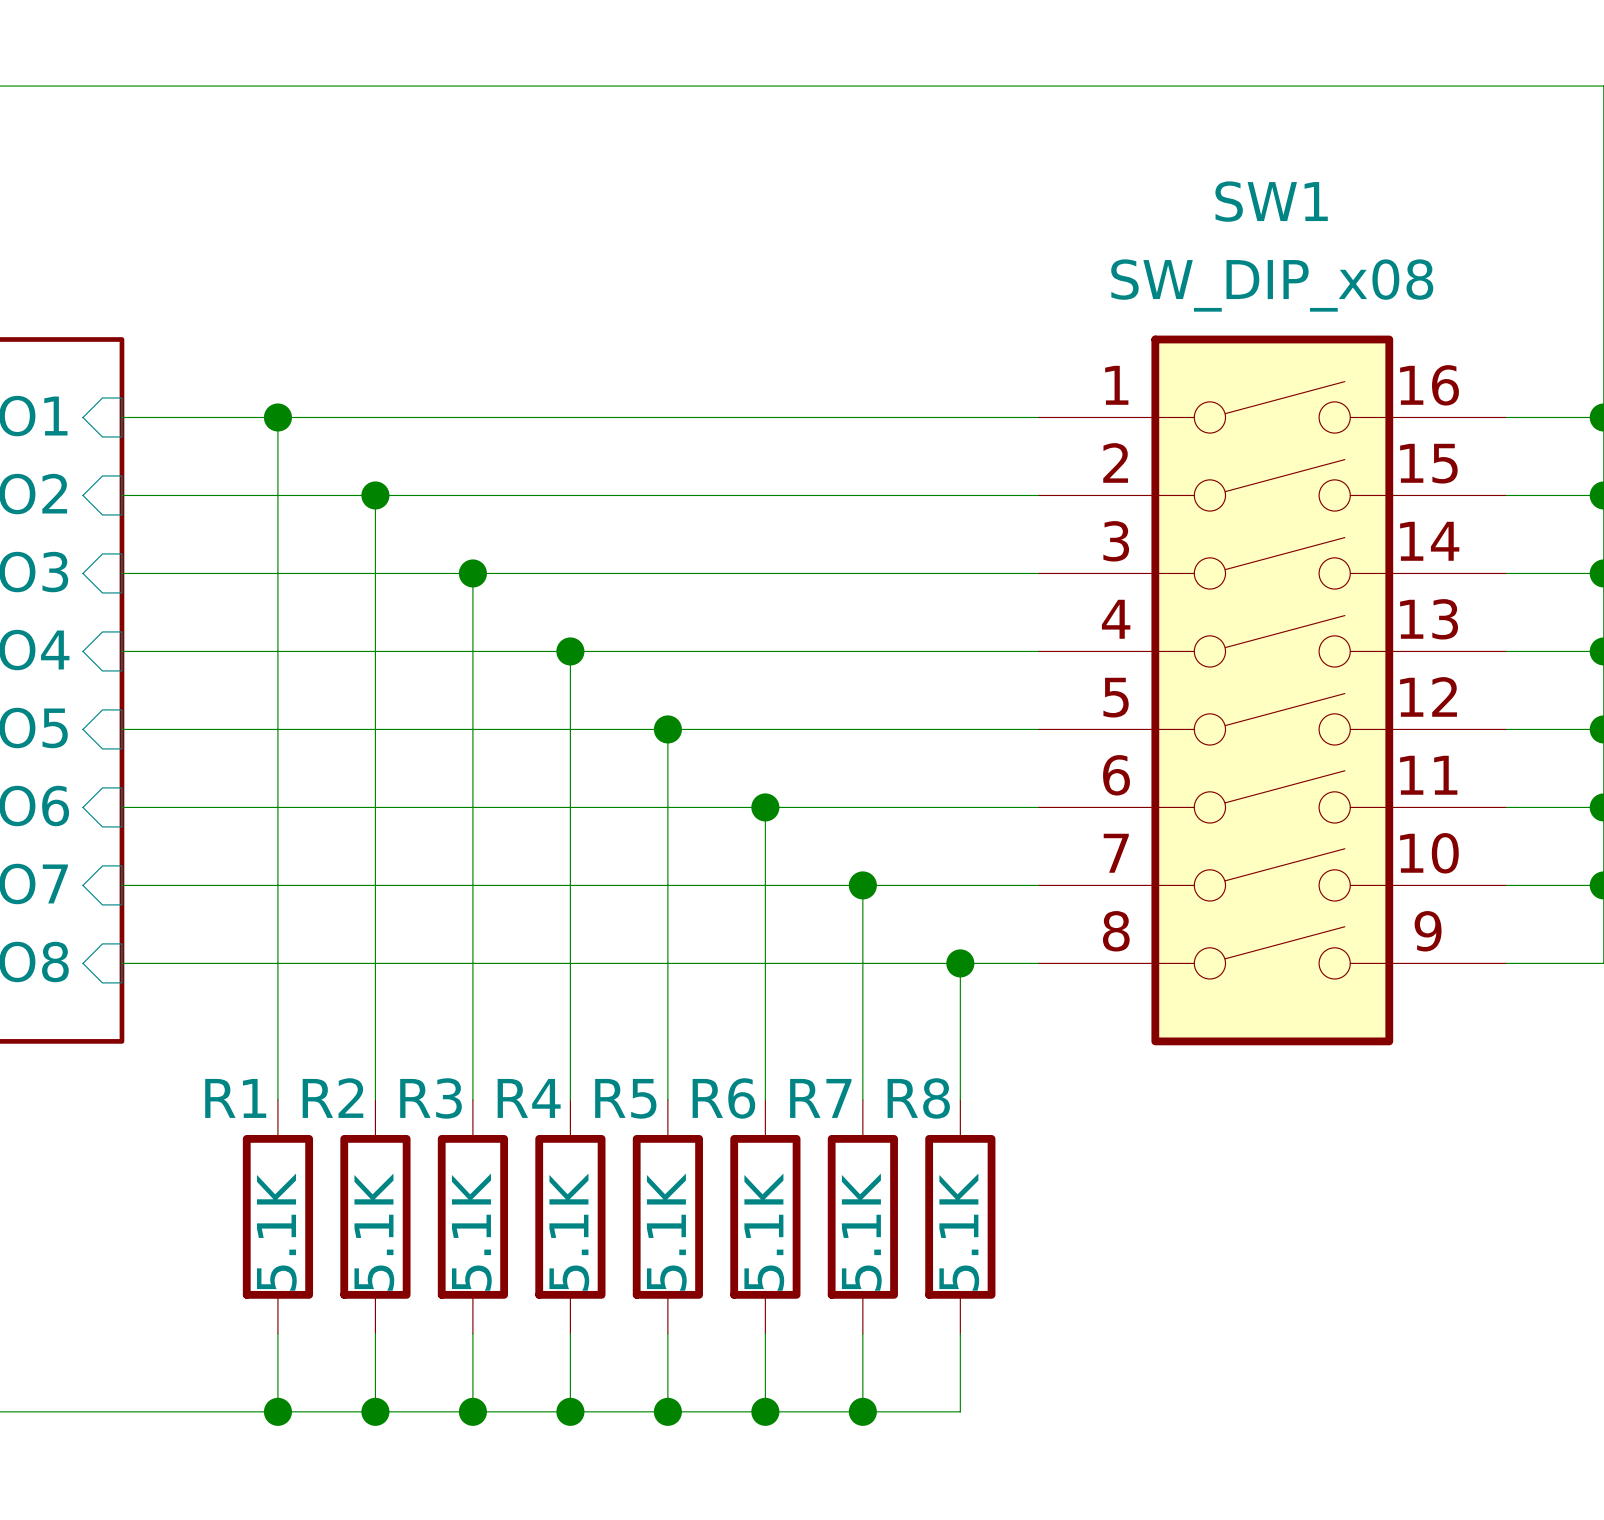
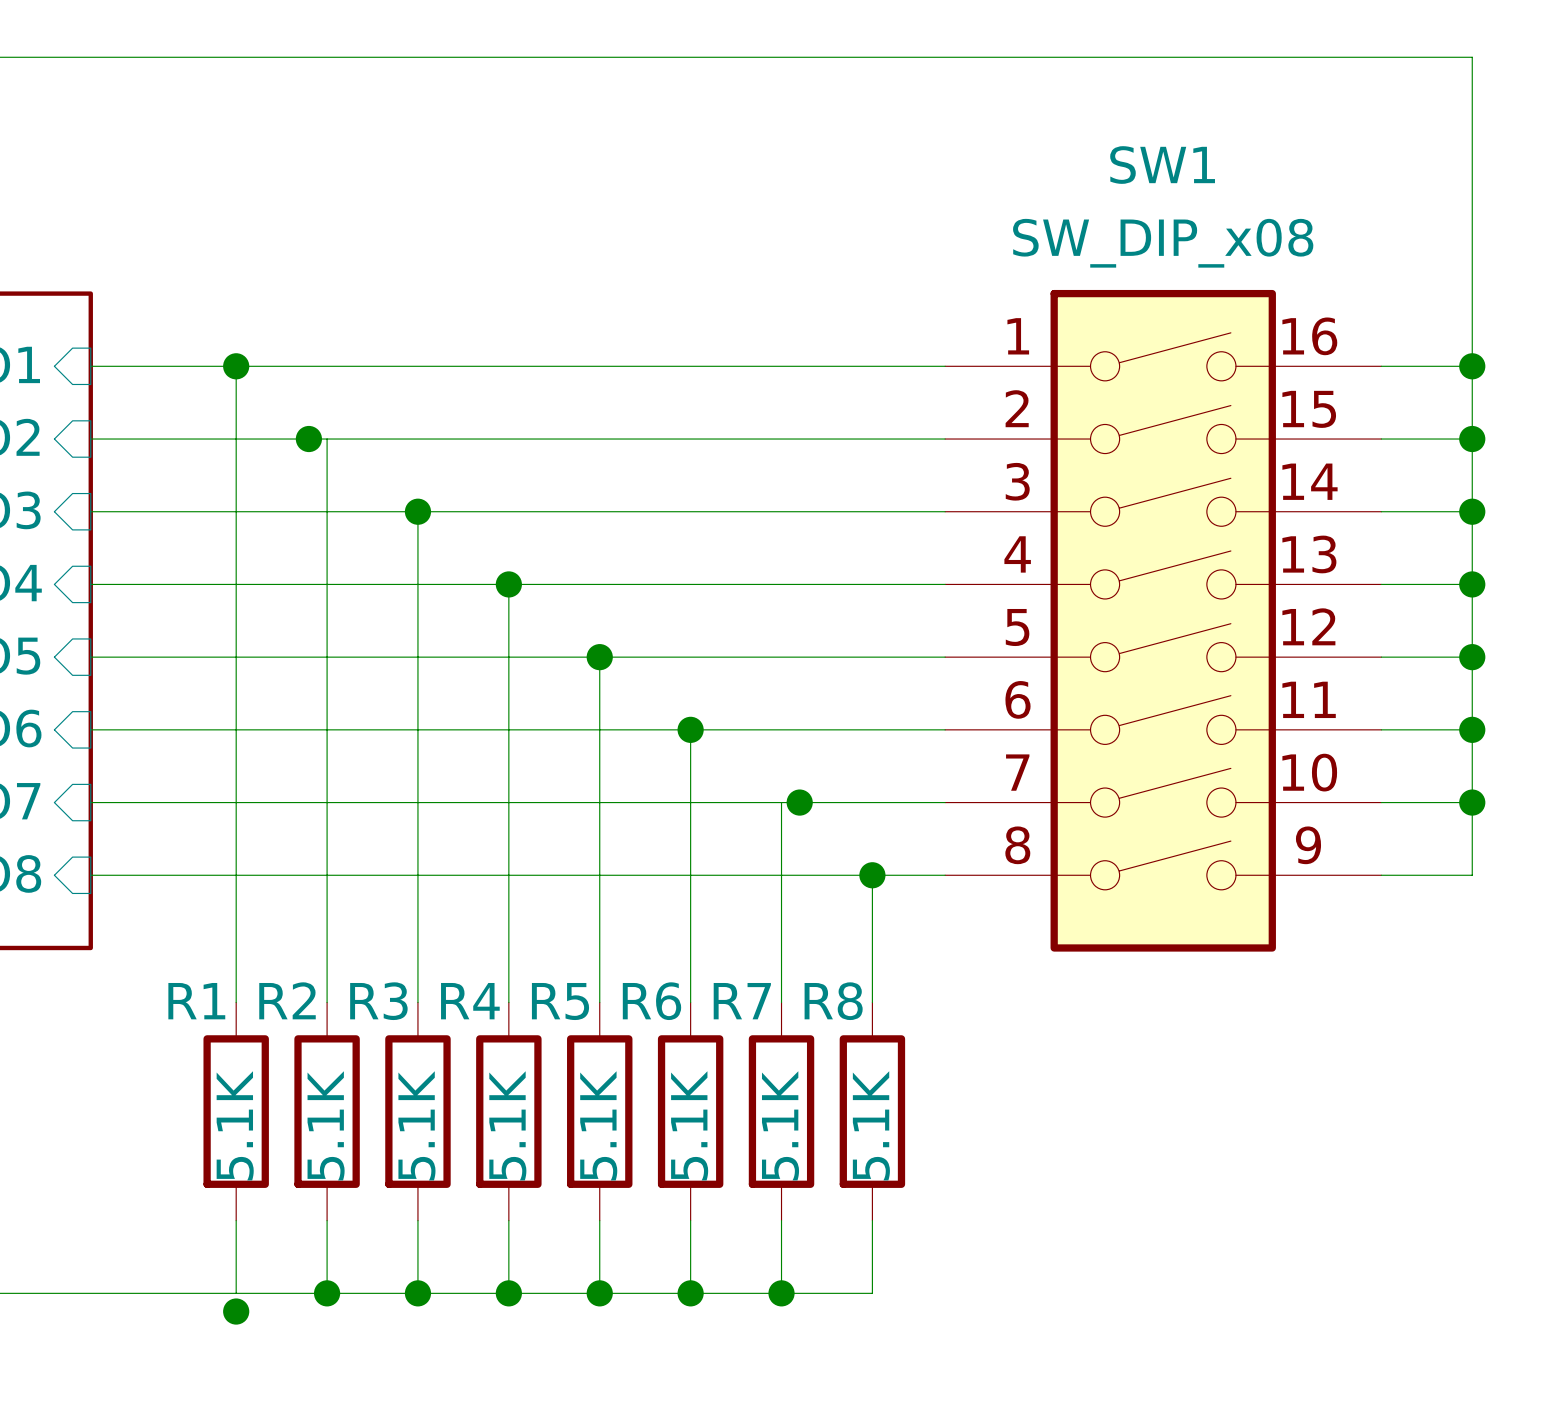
junction position: (375, 495) -> (308, 439)
junction position: (862, 885) -> (799, 802)
junction position: (277, 1411) -> (236, 1311)

